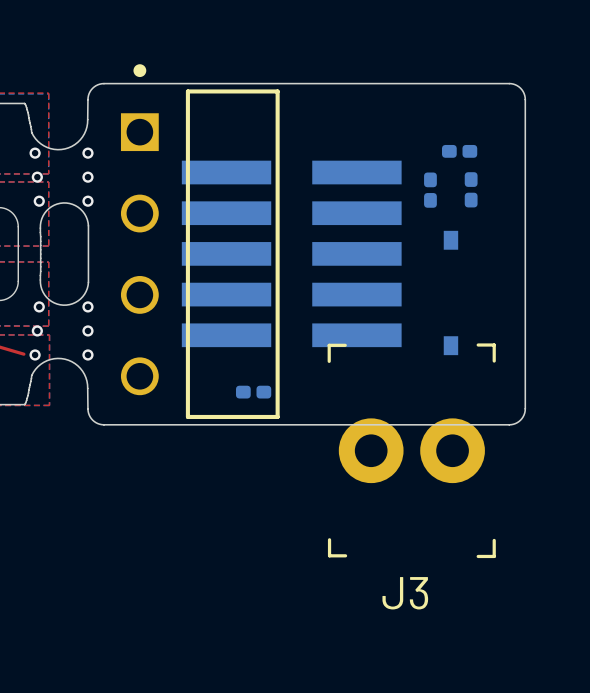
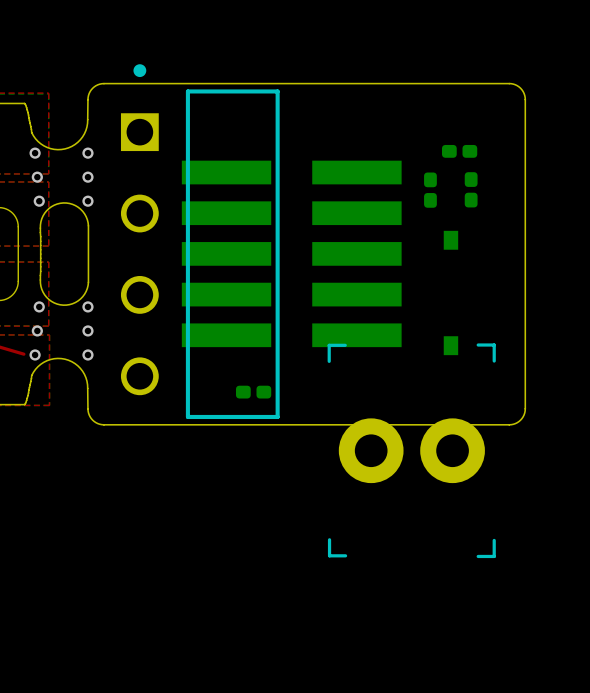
J3 name: J3 (405, 593) -> none

